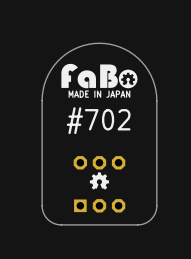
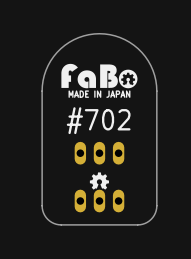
part footprint: [42, 43, 157, 225] -> [42, 33, 157, 225]
part: none -> (99, 153)
part: (99, 162) -> none

